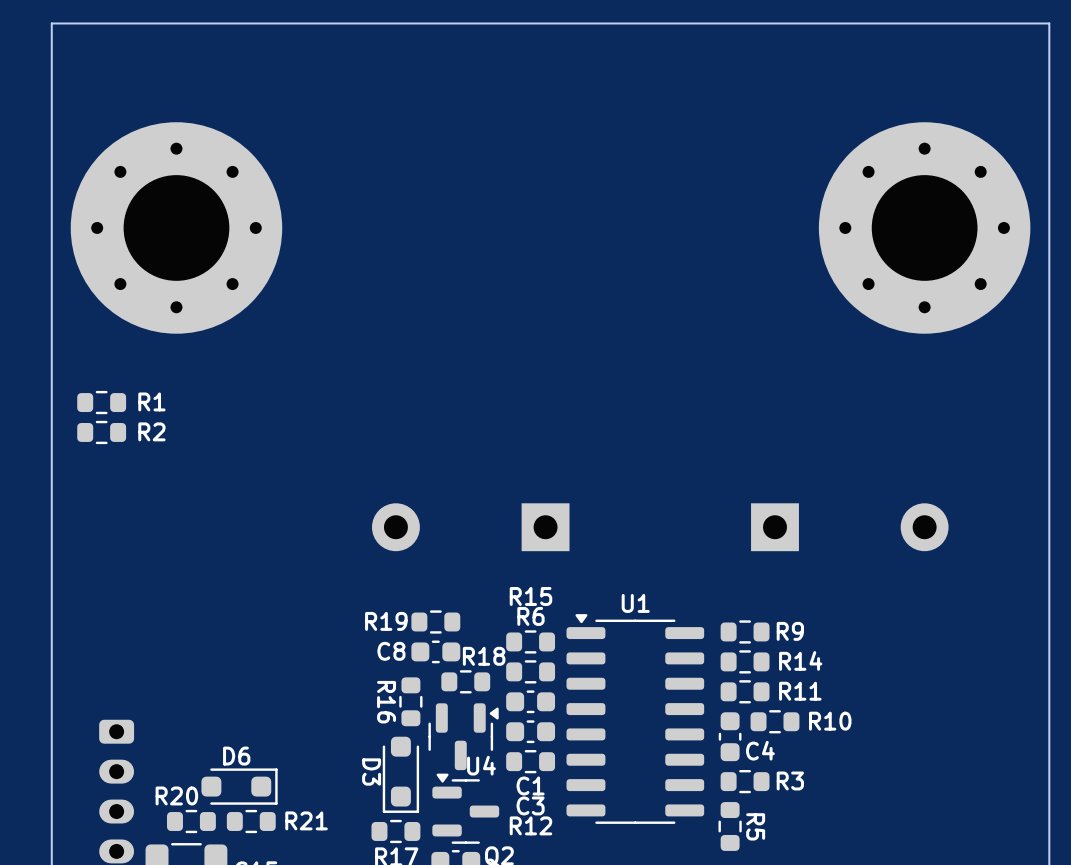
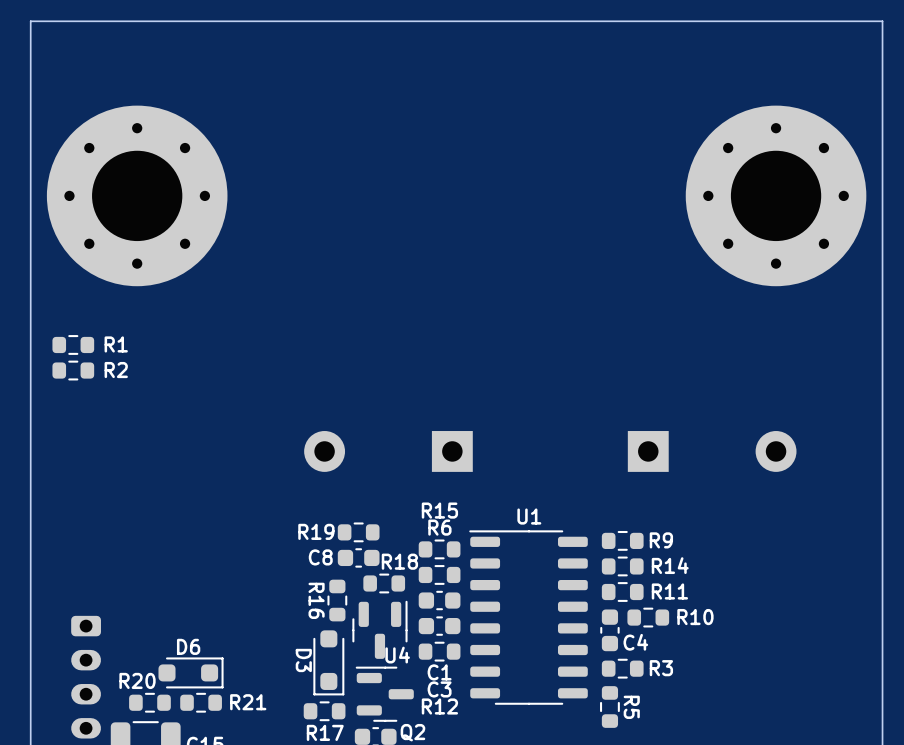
U1 footprint: [566, 614, 705, 824] -> [469, 530, 588, 705]
U4 footprint: [428, 703, 499, 771] -> [352, 600, 408, 659]
Q2 footprint: [432, 773, 500, 844] -> [355, 666, 414, 722]

